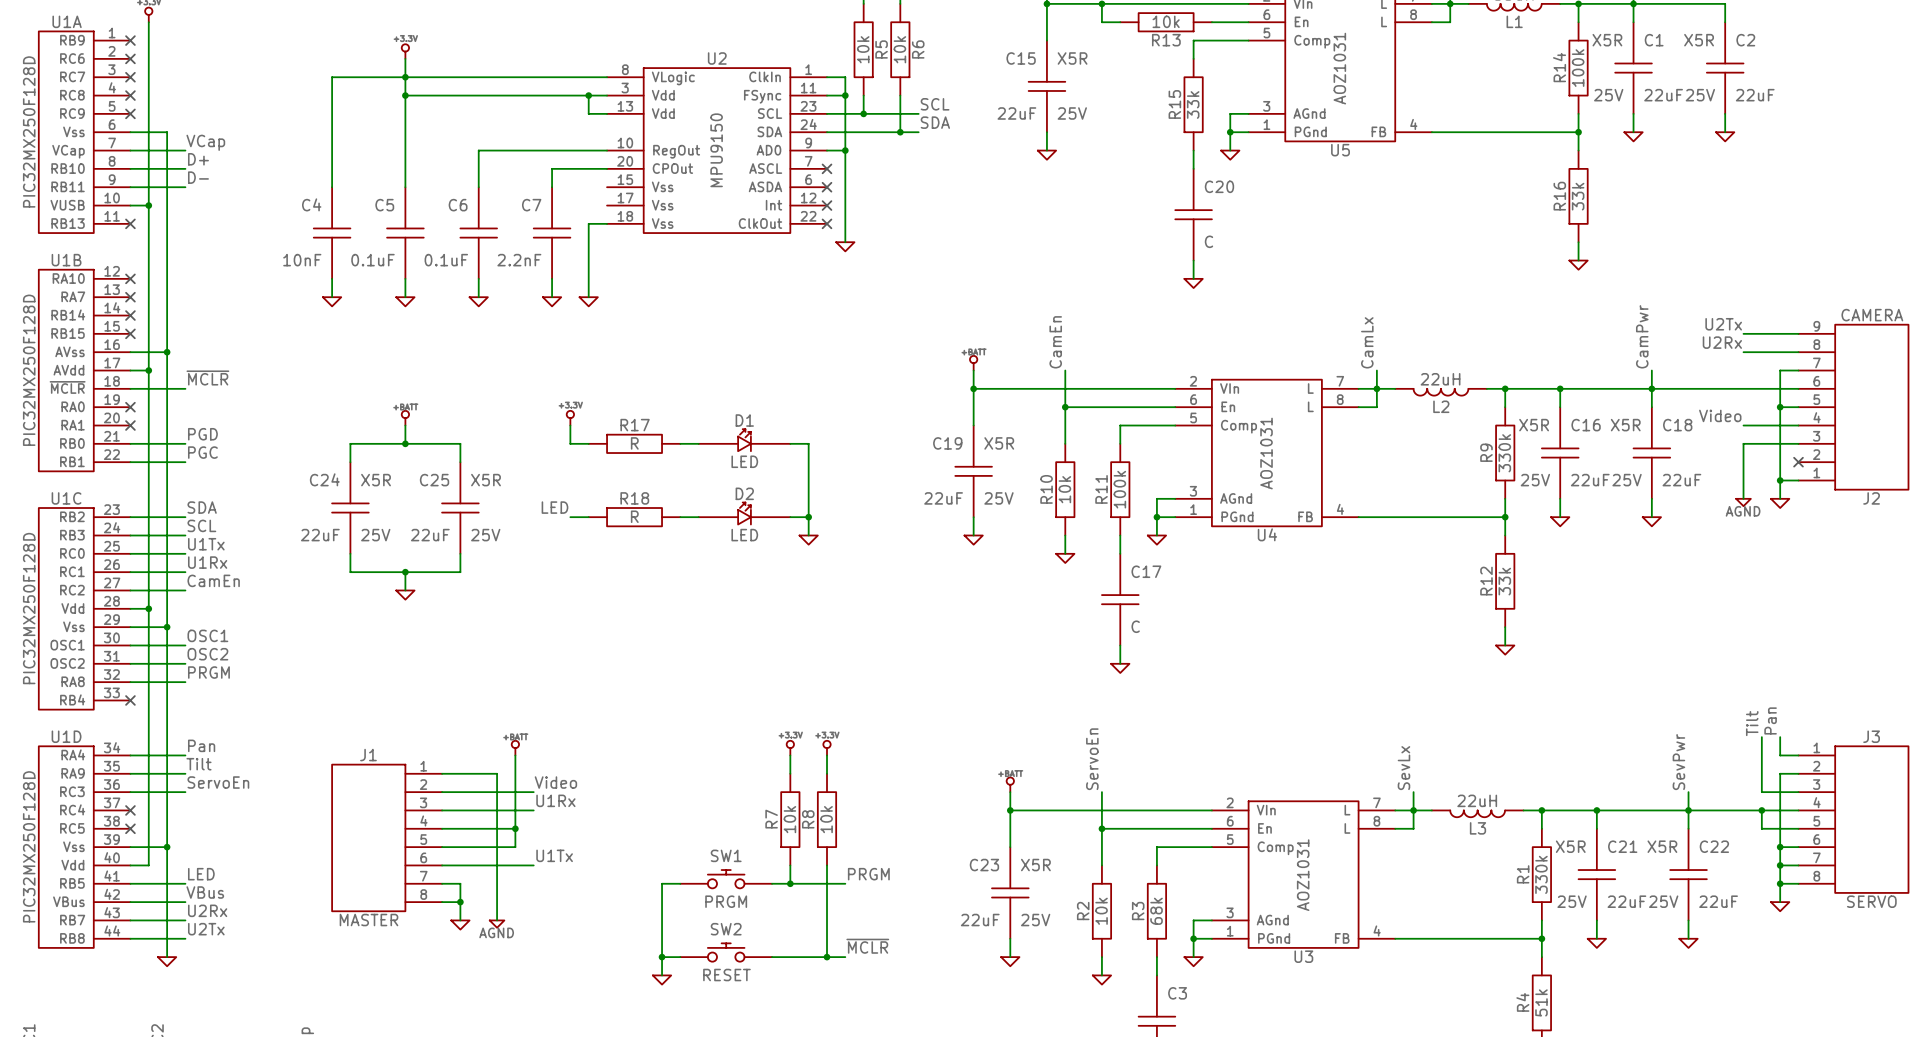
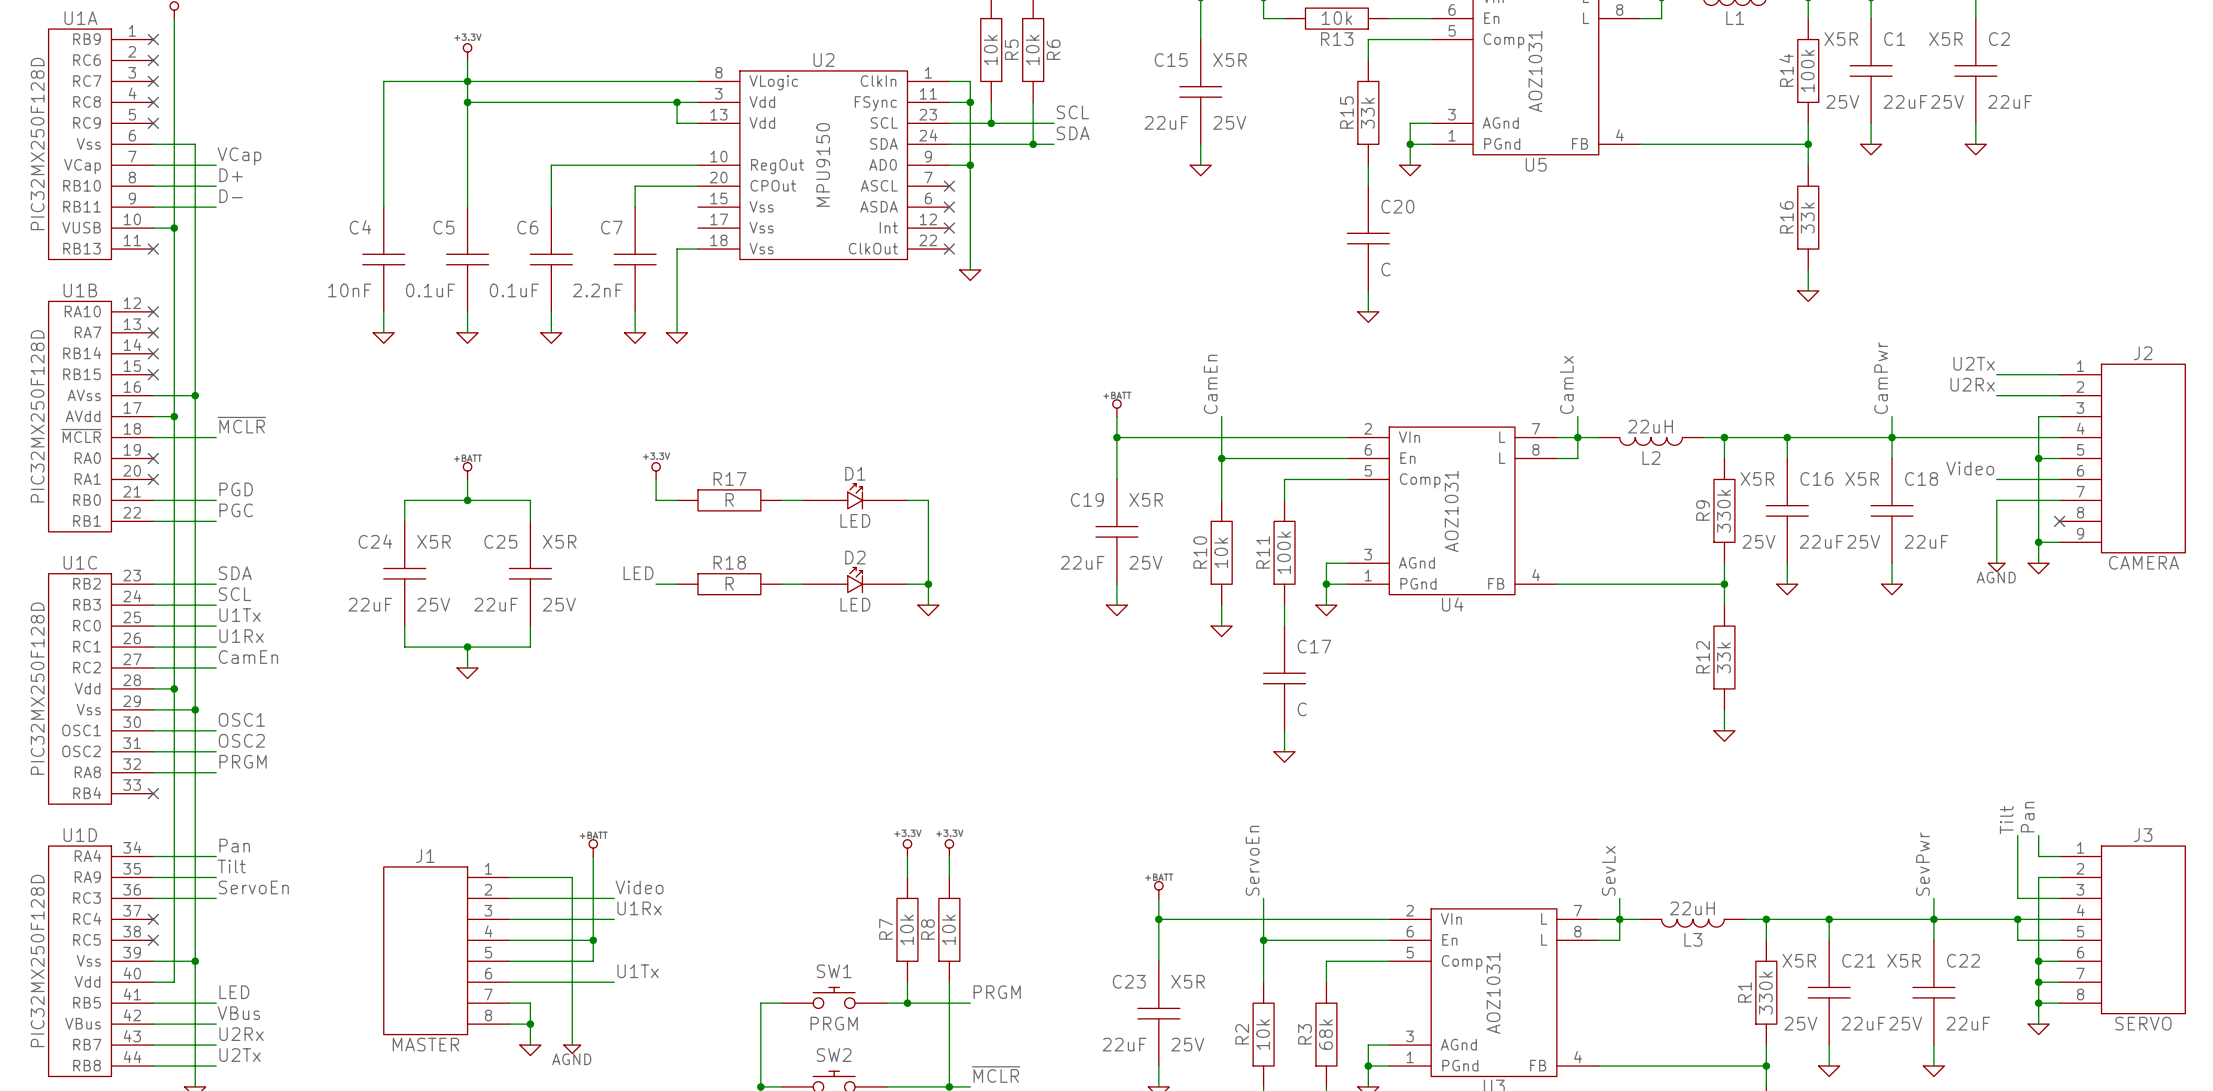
J2 flip: as is (1871, 407) -> up-down (2143, 458)

